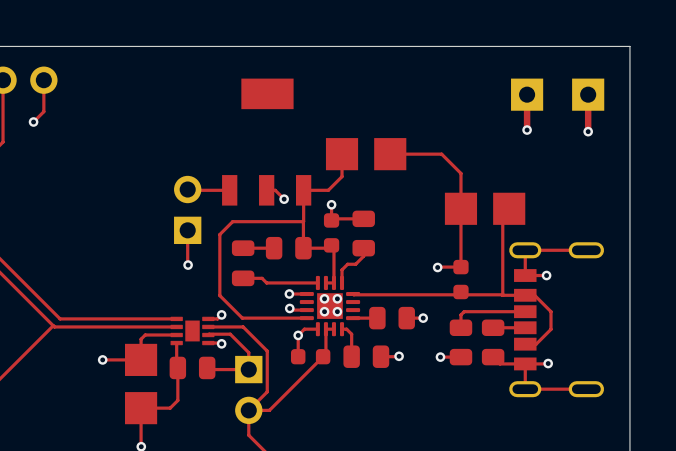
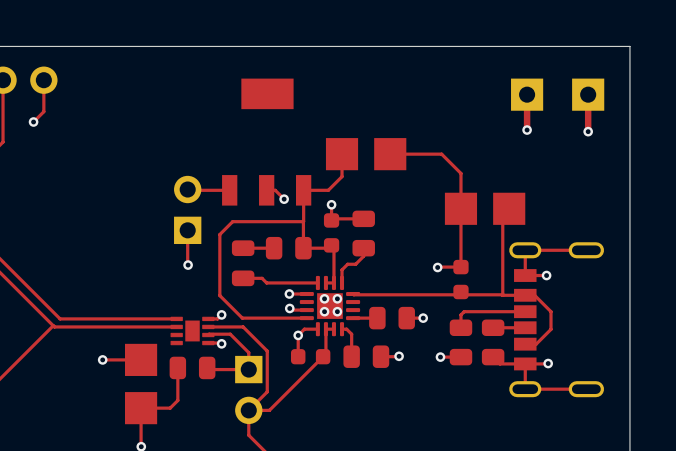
top track: (176, 335) (145, 335) (141, 339) (141, 359) -> none
top track: (176, 343) (177, 367) -> none

